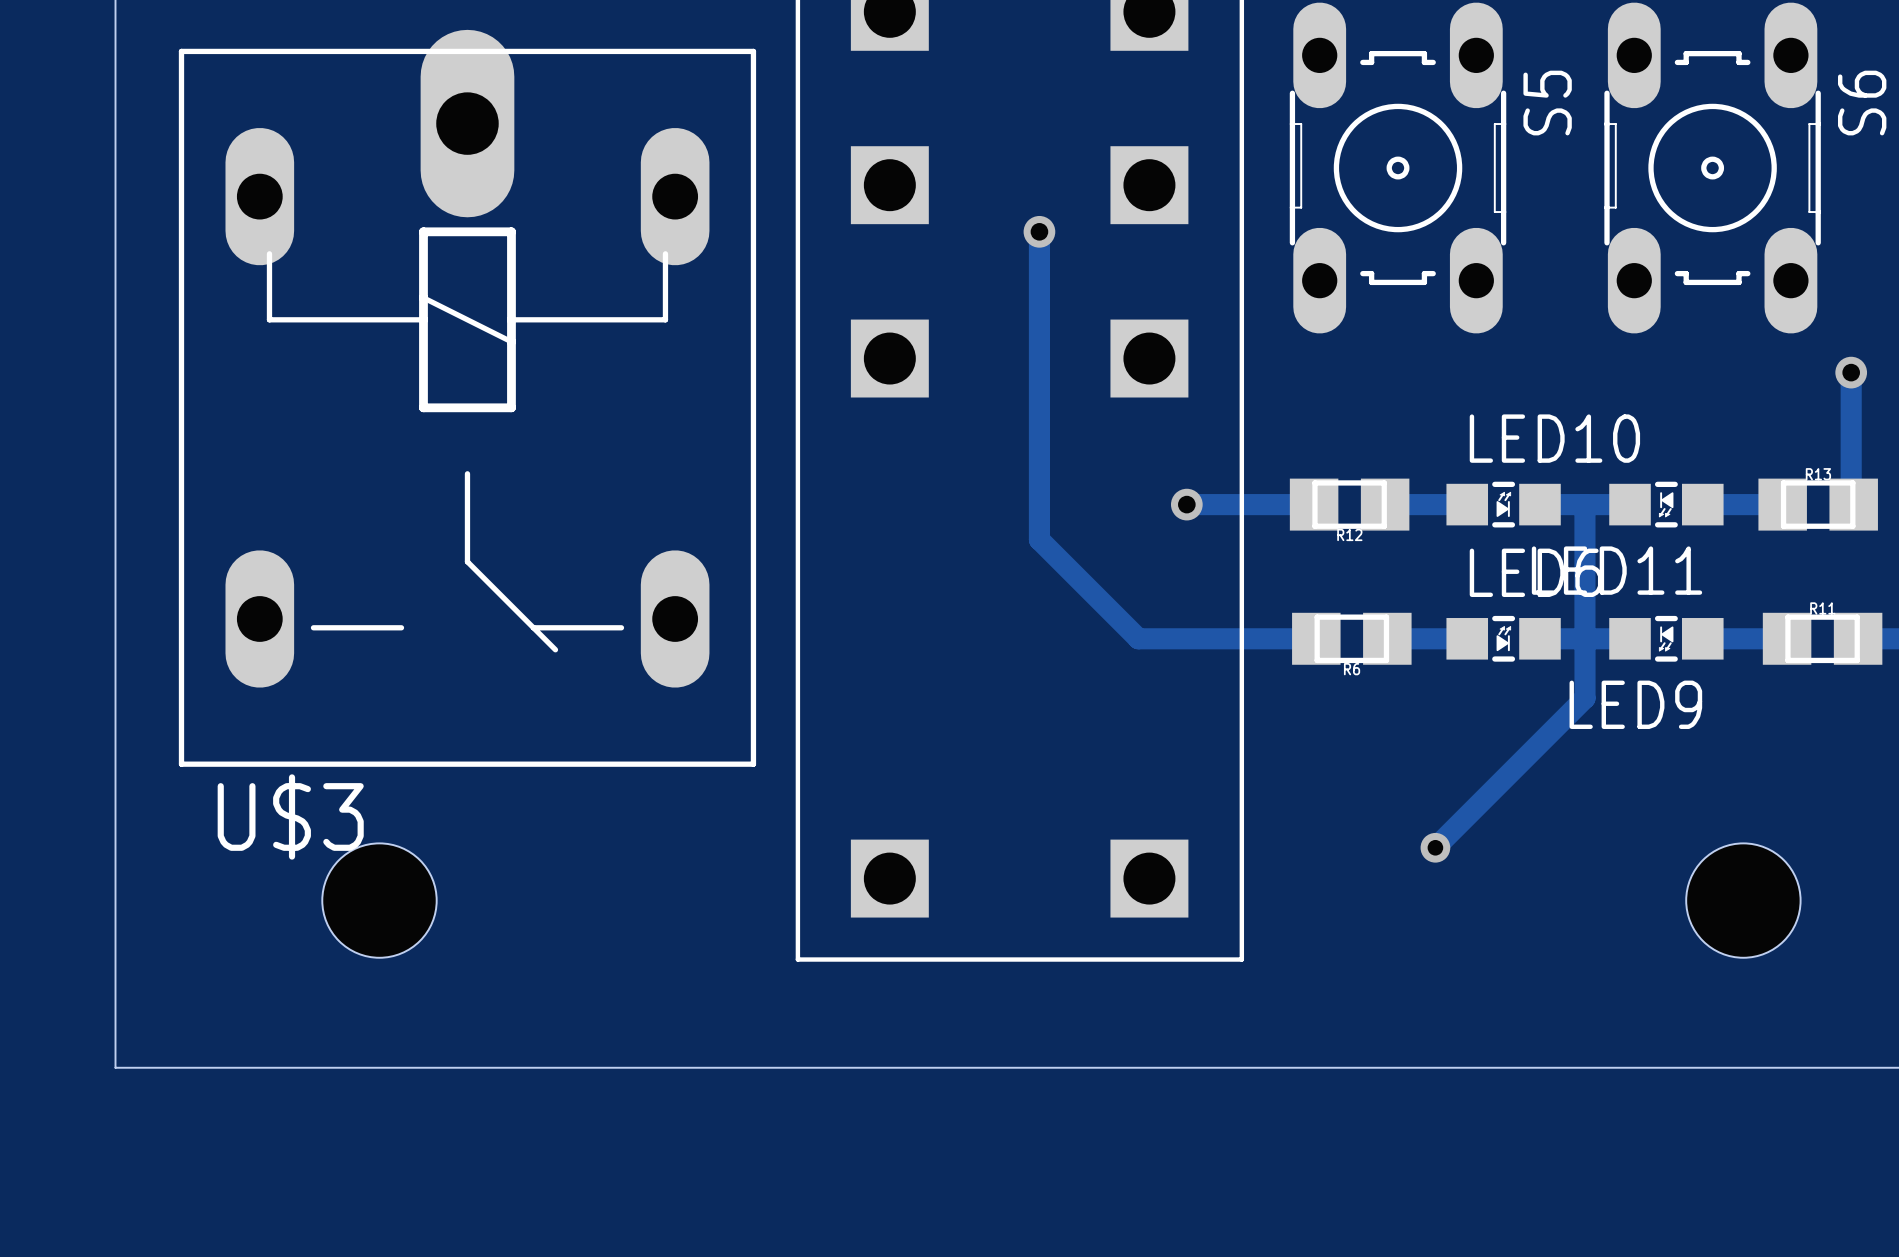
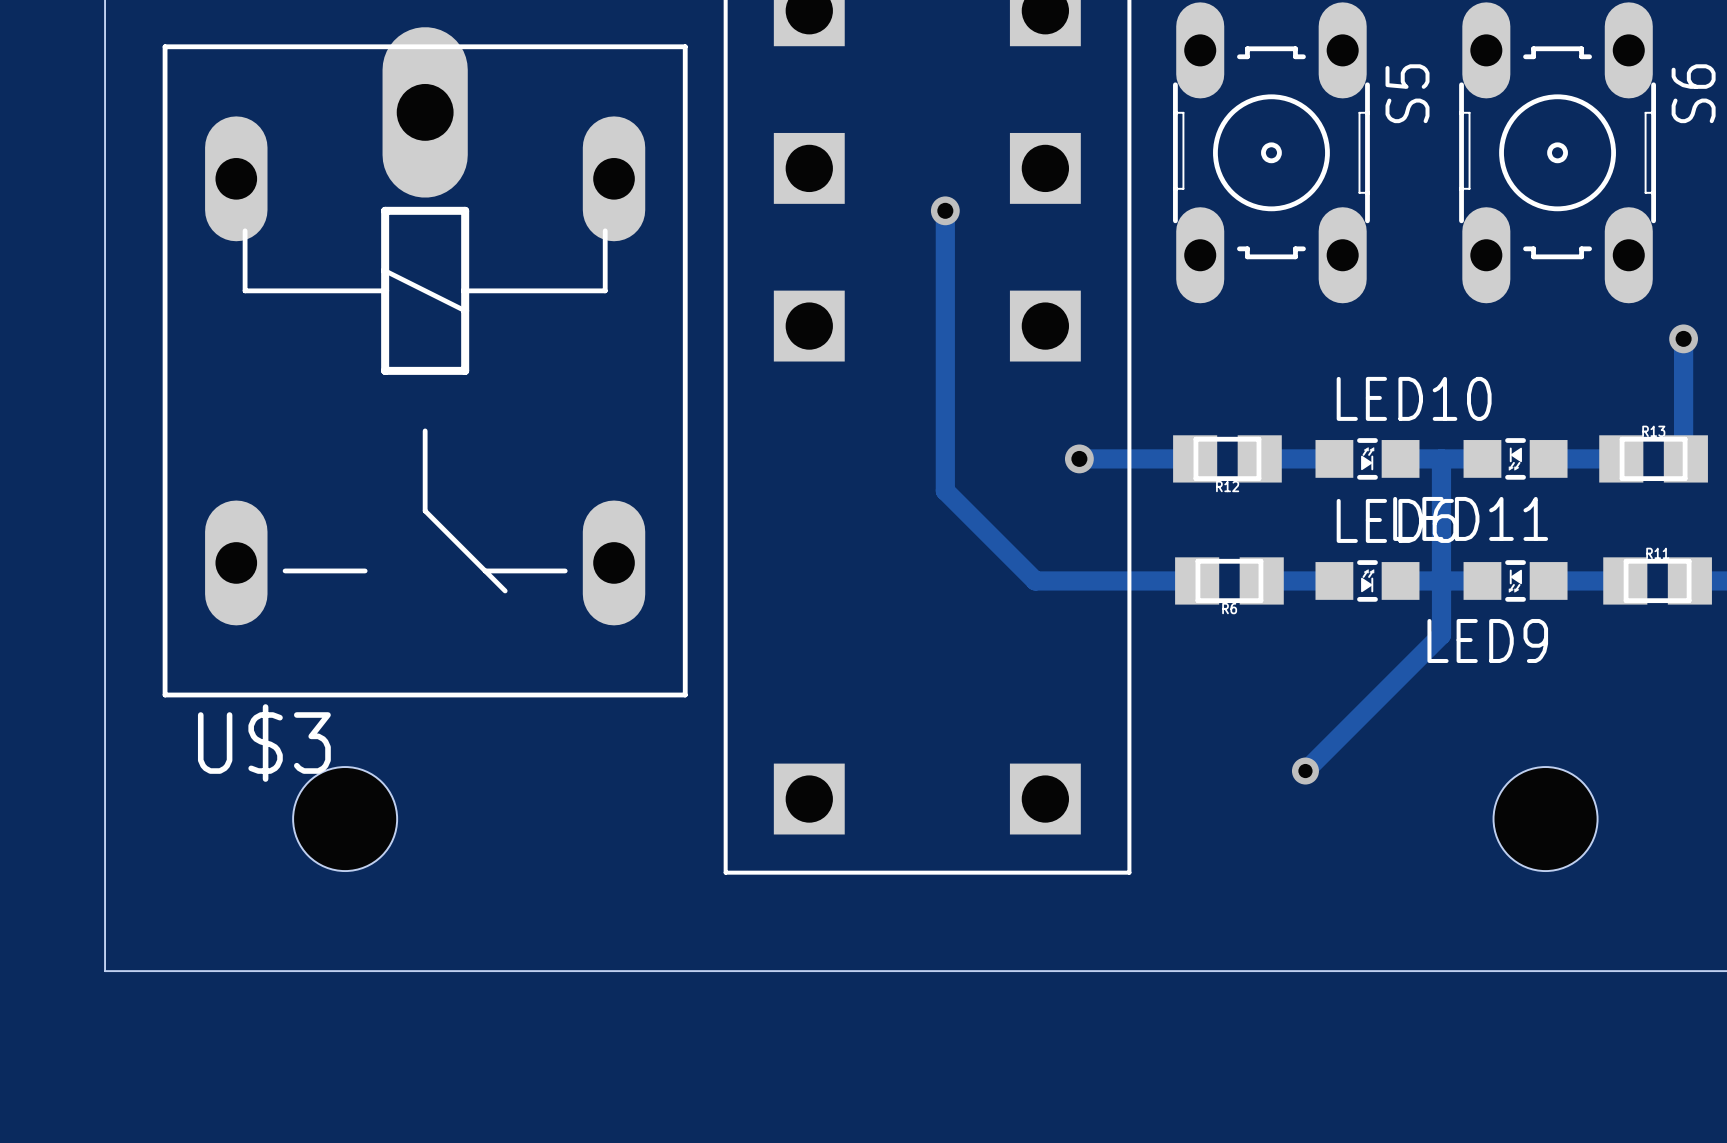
hole position: (1743, 900) -> (1545, 819)

